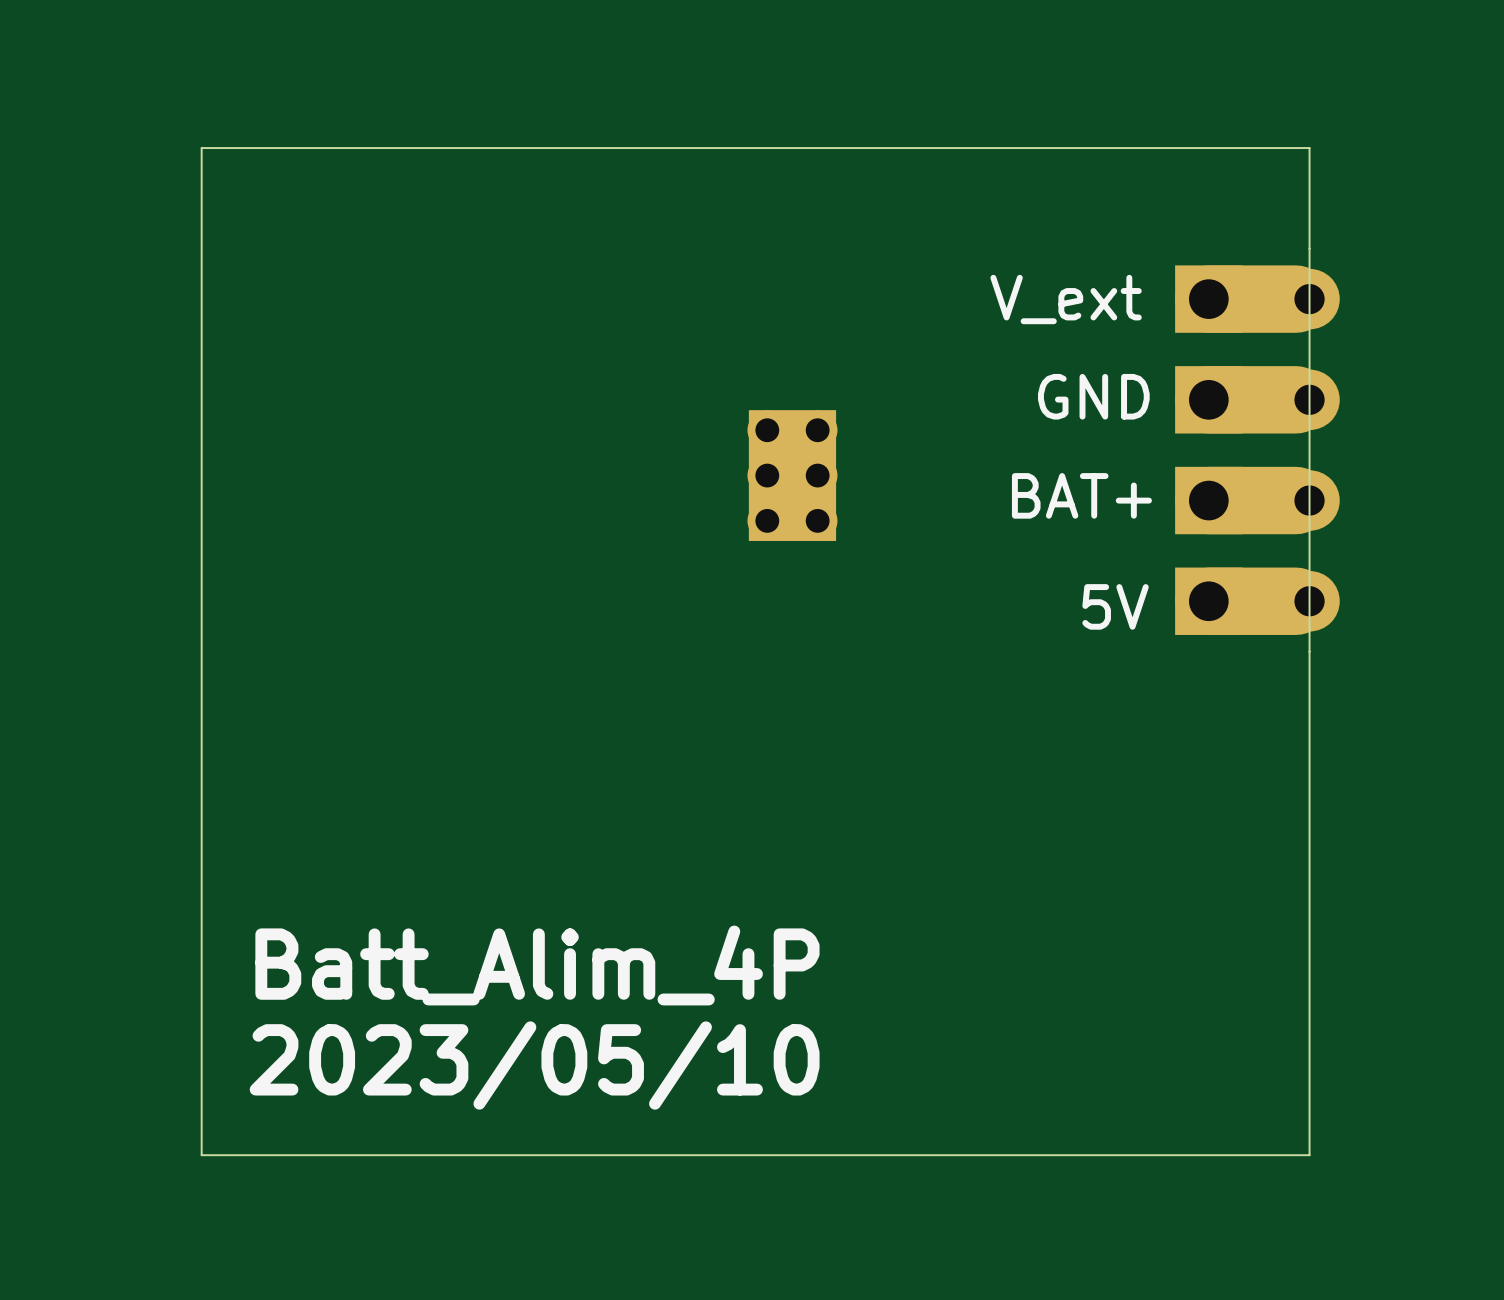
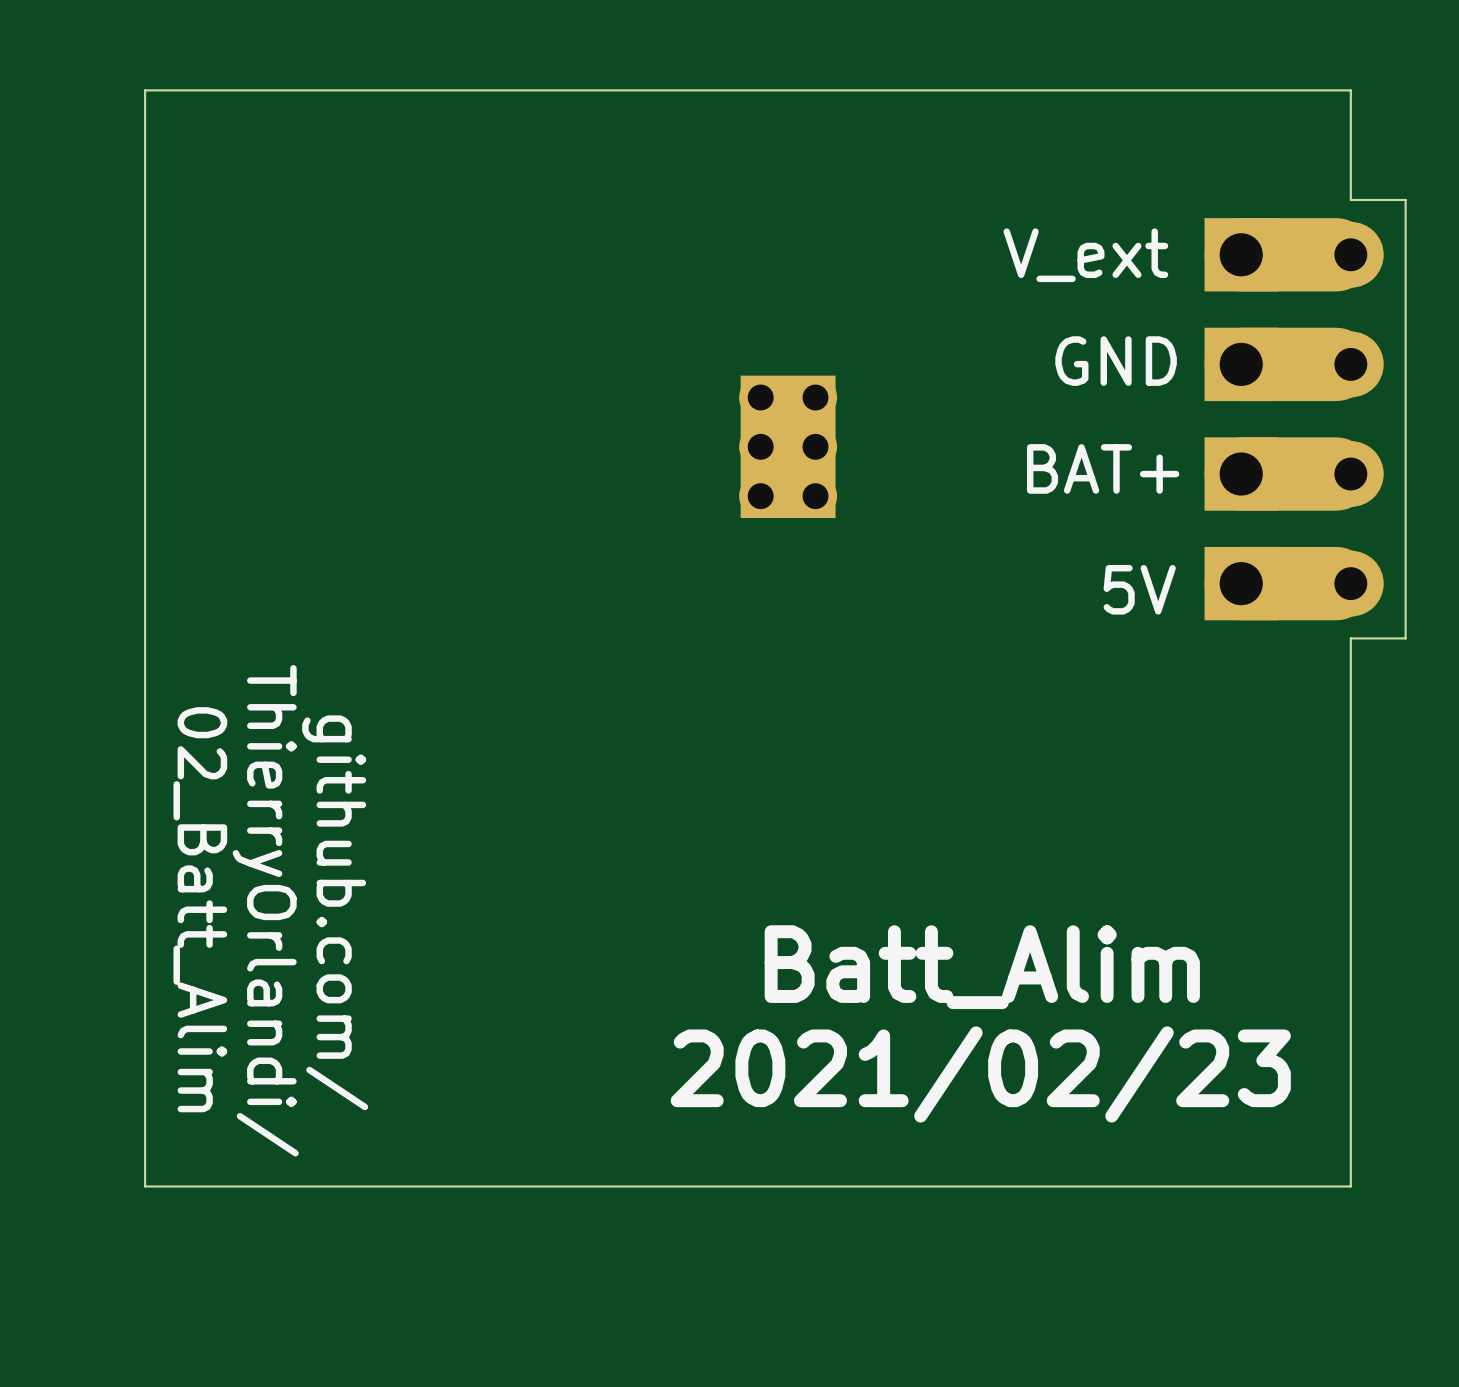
board edge: (1309, 248) (1309, 651) -> (1350, 199) (1405, 199) (1405, 638) (1350, 638)
text: none -> 02_Batt_Alim (200, 909)
text: none -> ThierryOrlandi/ (265, 910)
text: none -> github.com/ (335, 912)
text: none -> Batt_Alim (982, 967)
text: Batt_Alim_4P (537, 965) -> none
text: none -> 2021/02/23 (980, 1074)
text: 2023/05/10 (534, 1065) -> none

